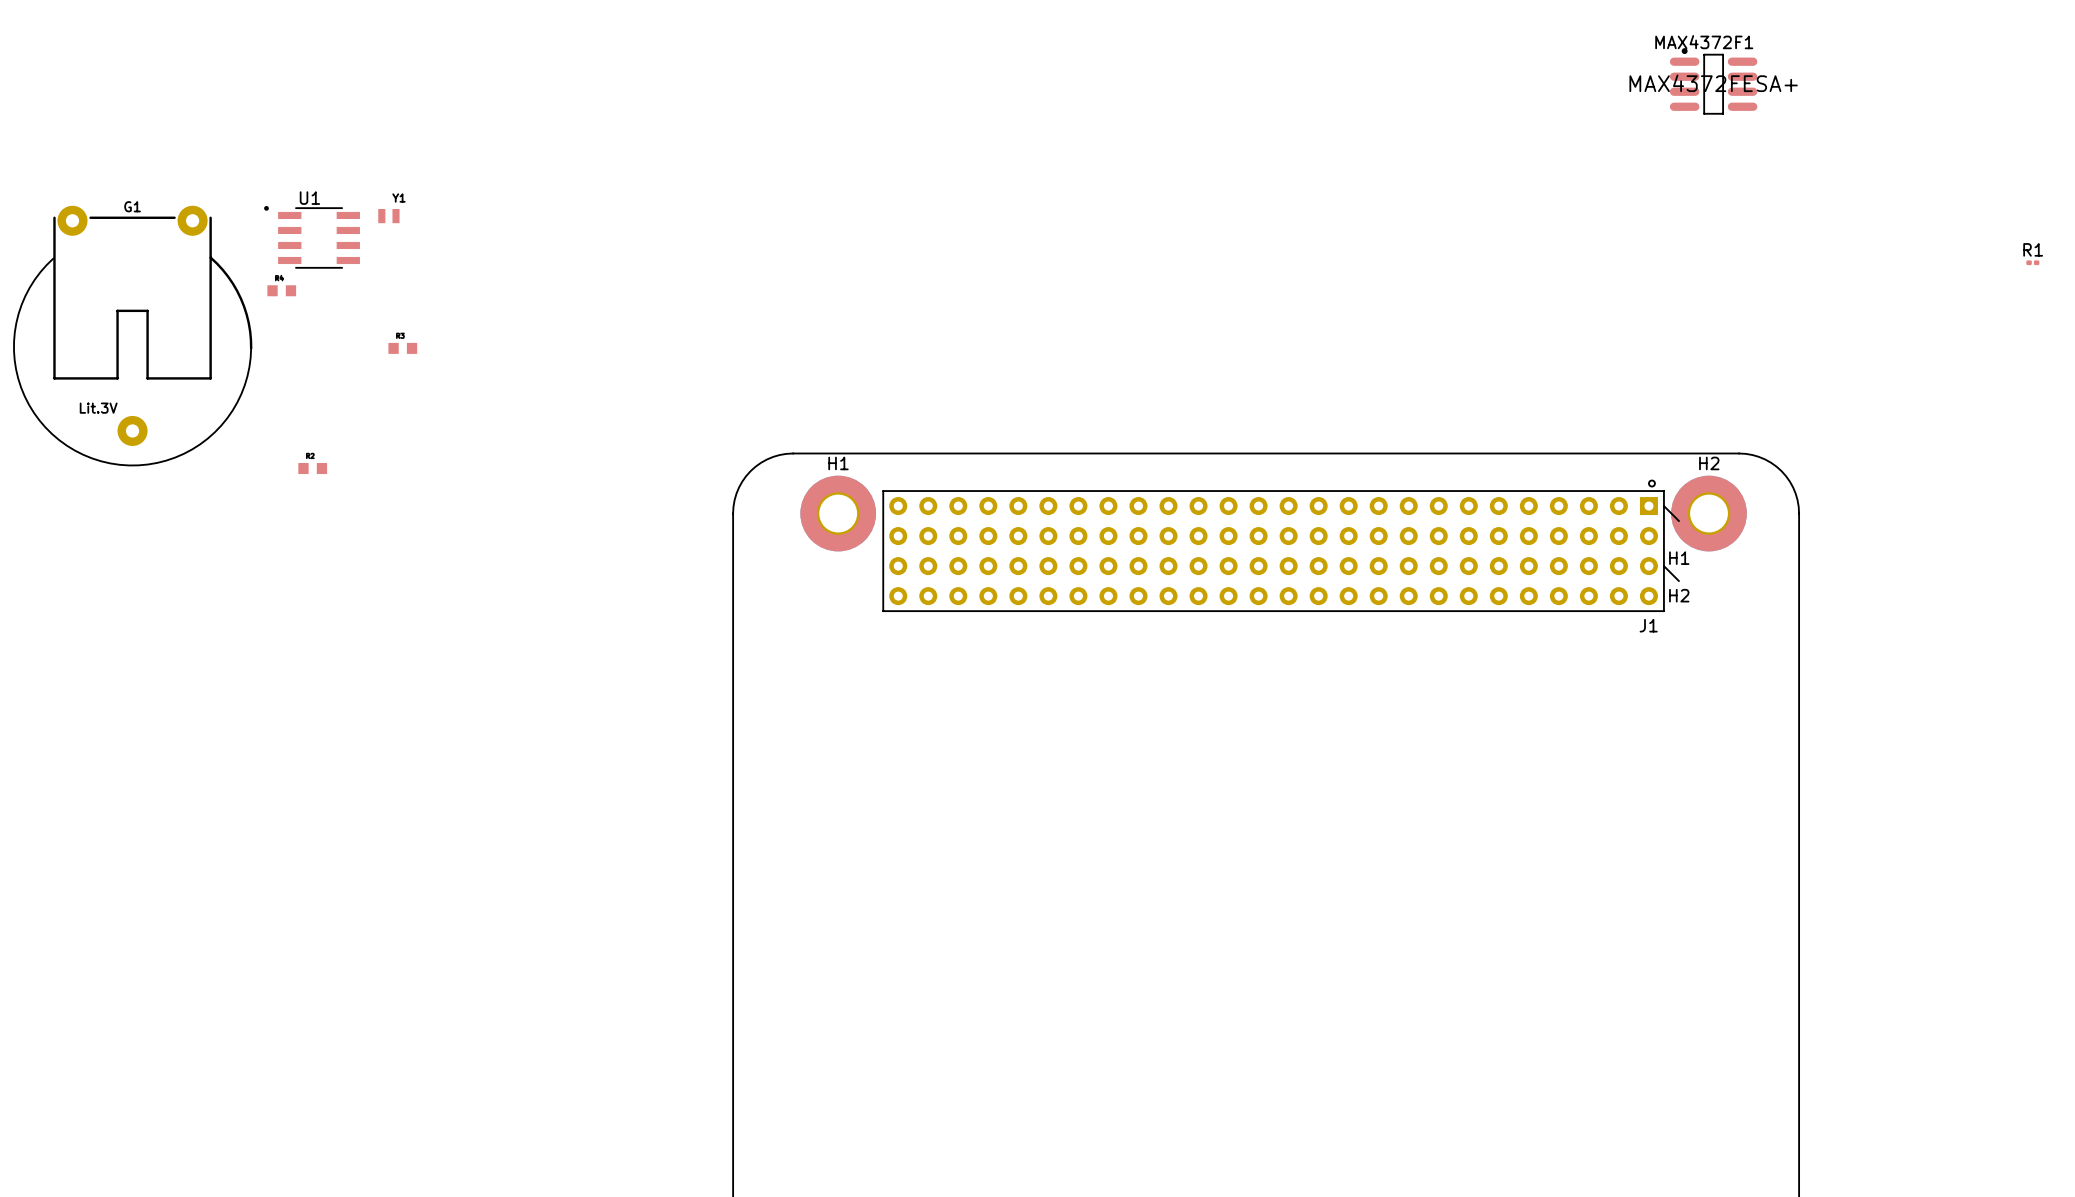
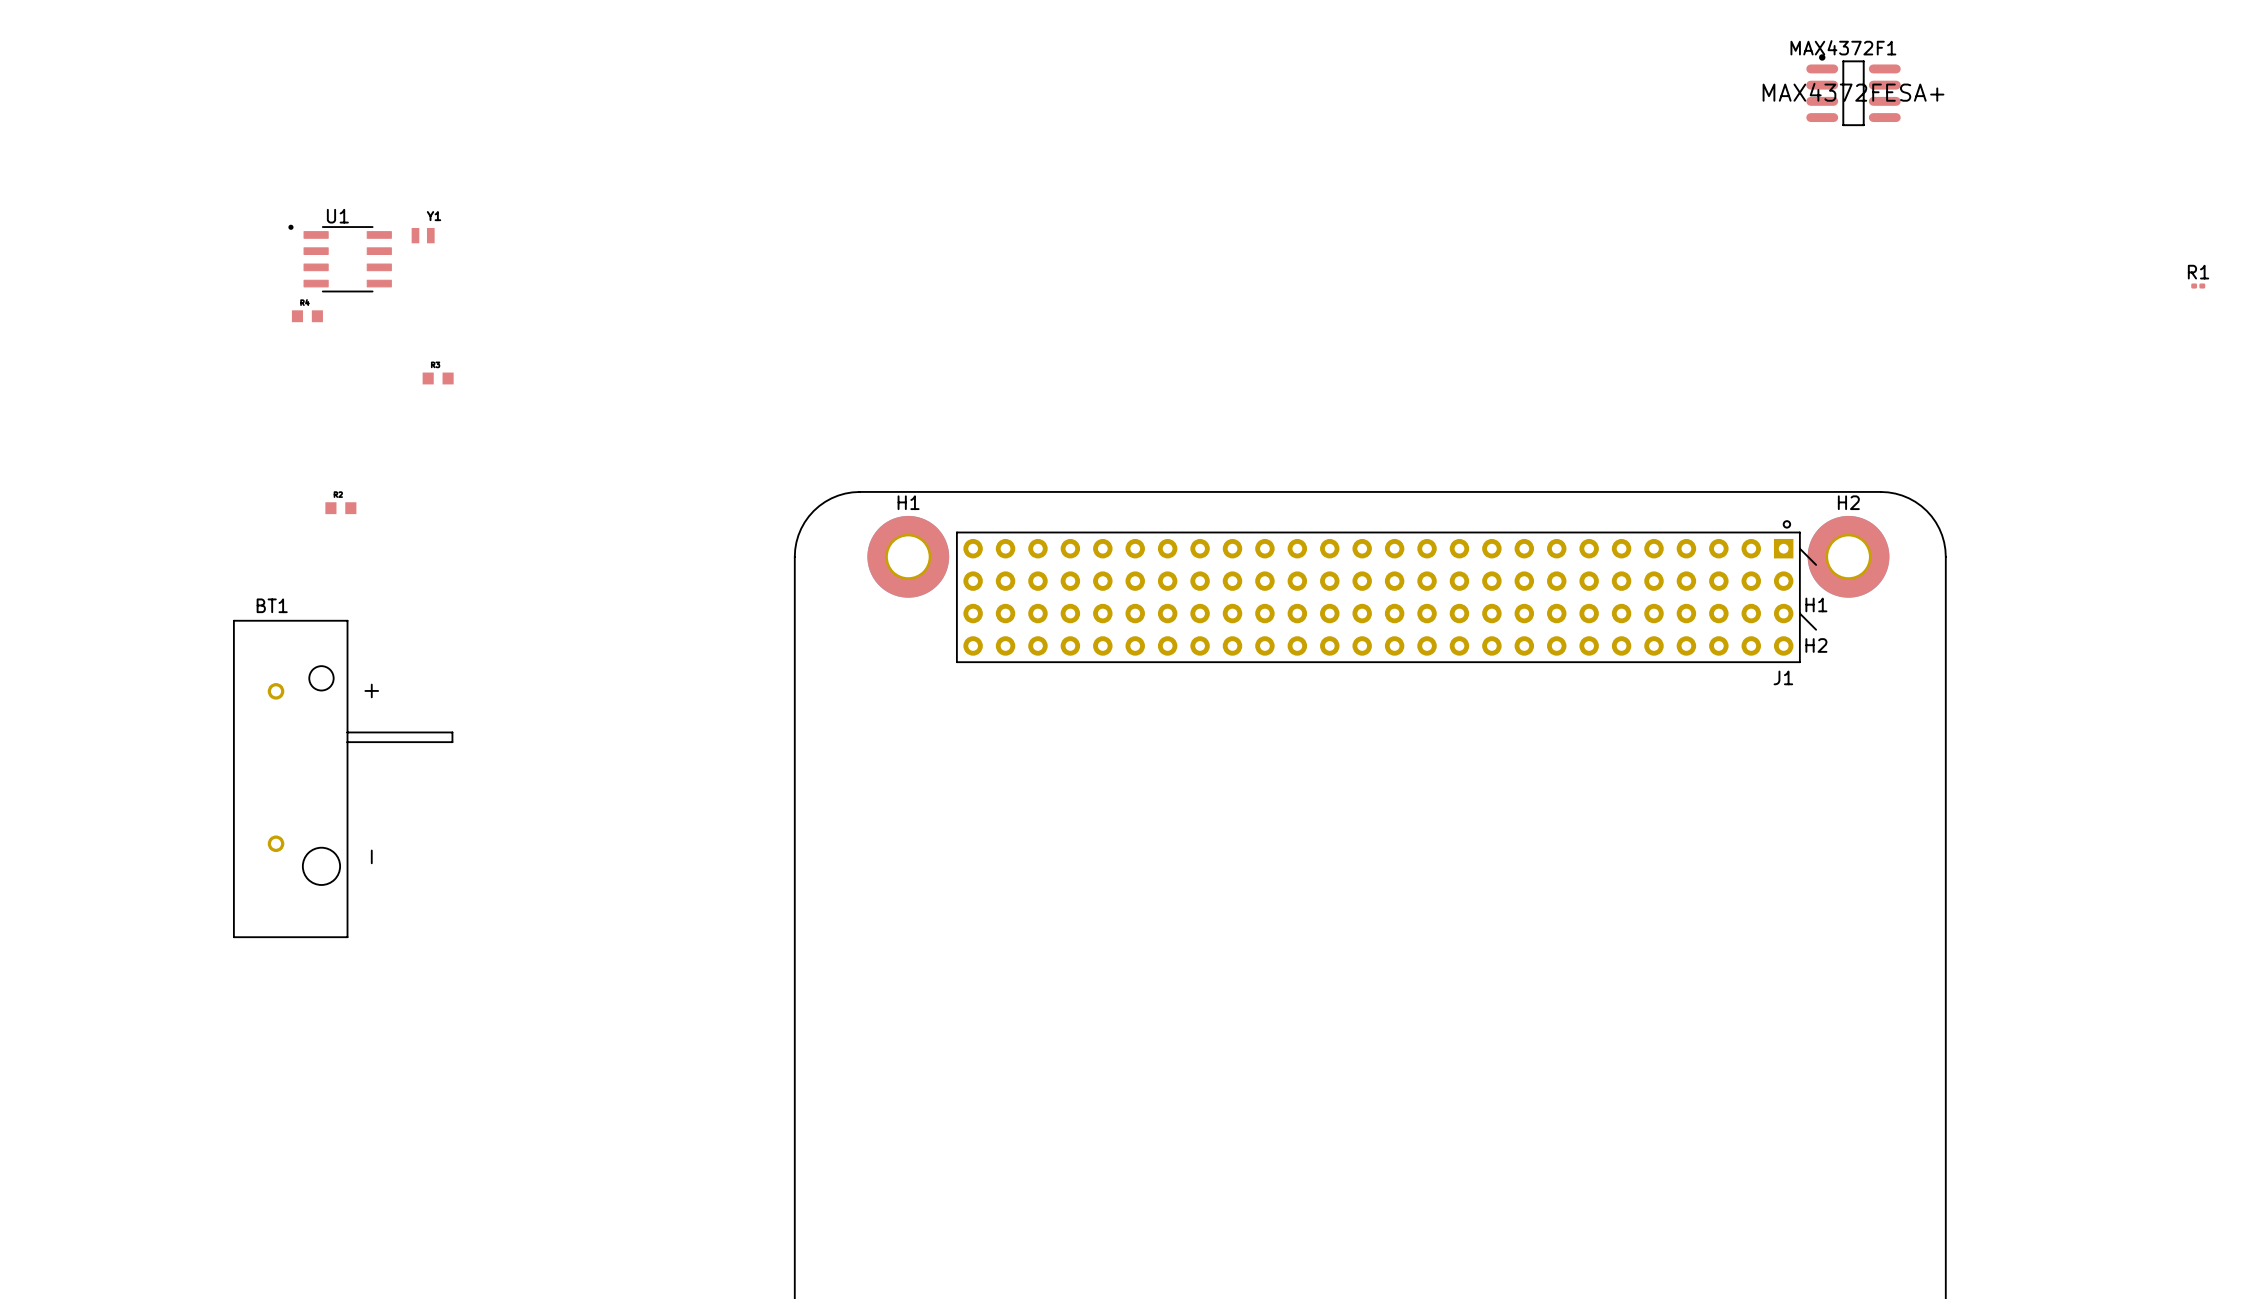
G1: (132, 336) -> none
BT1: none -> (343, 778)

